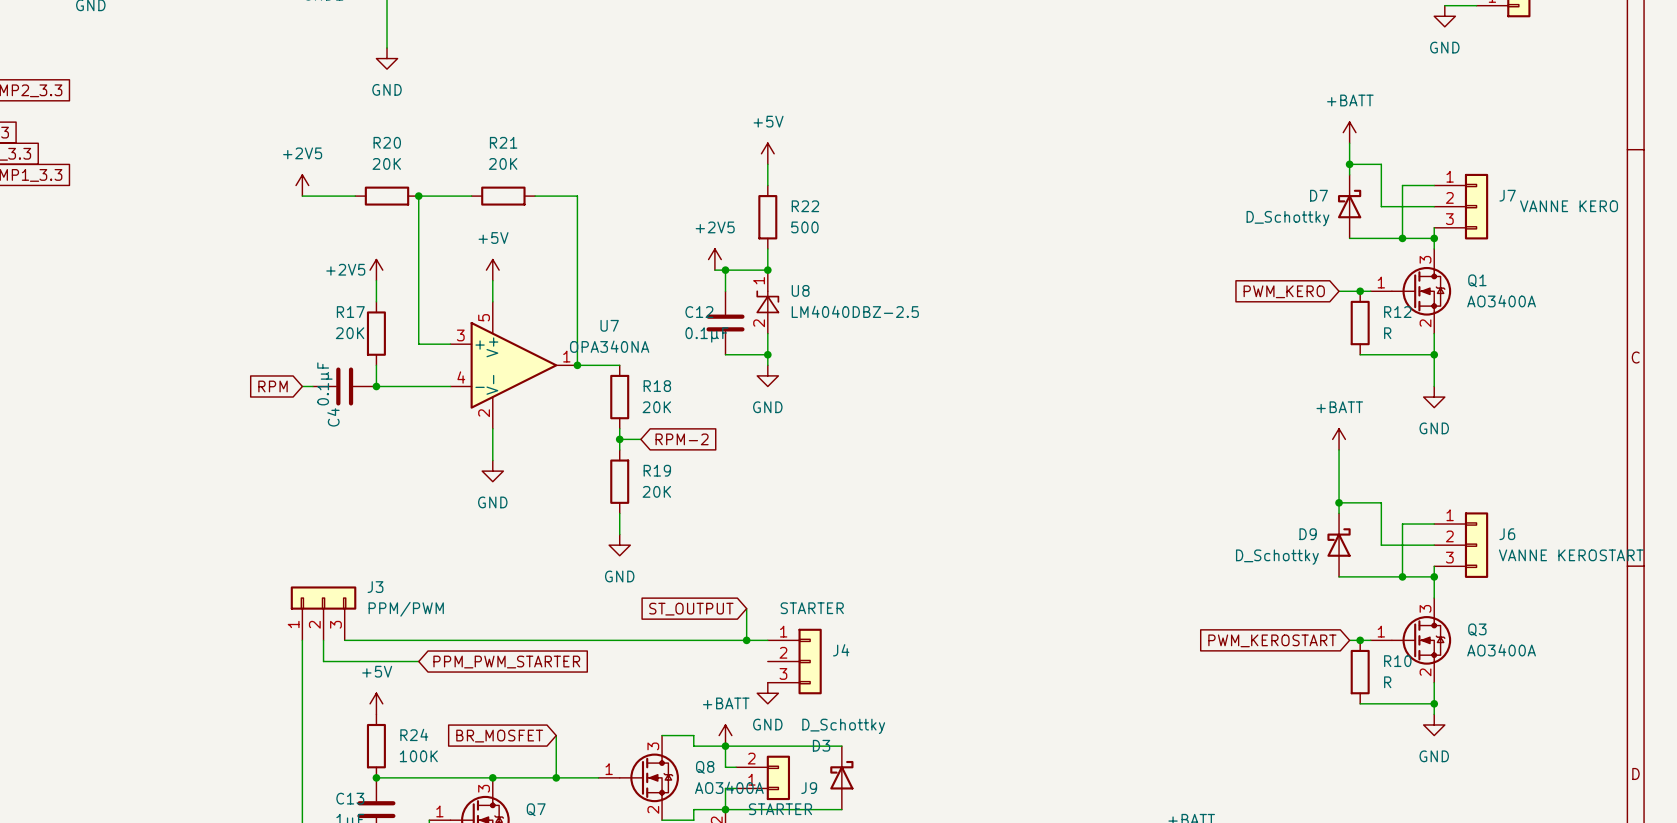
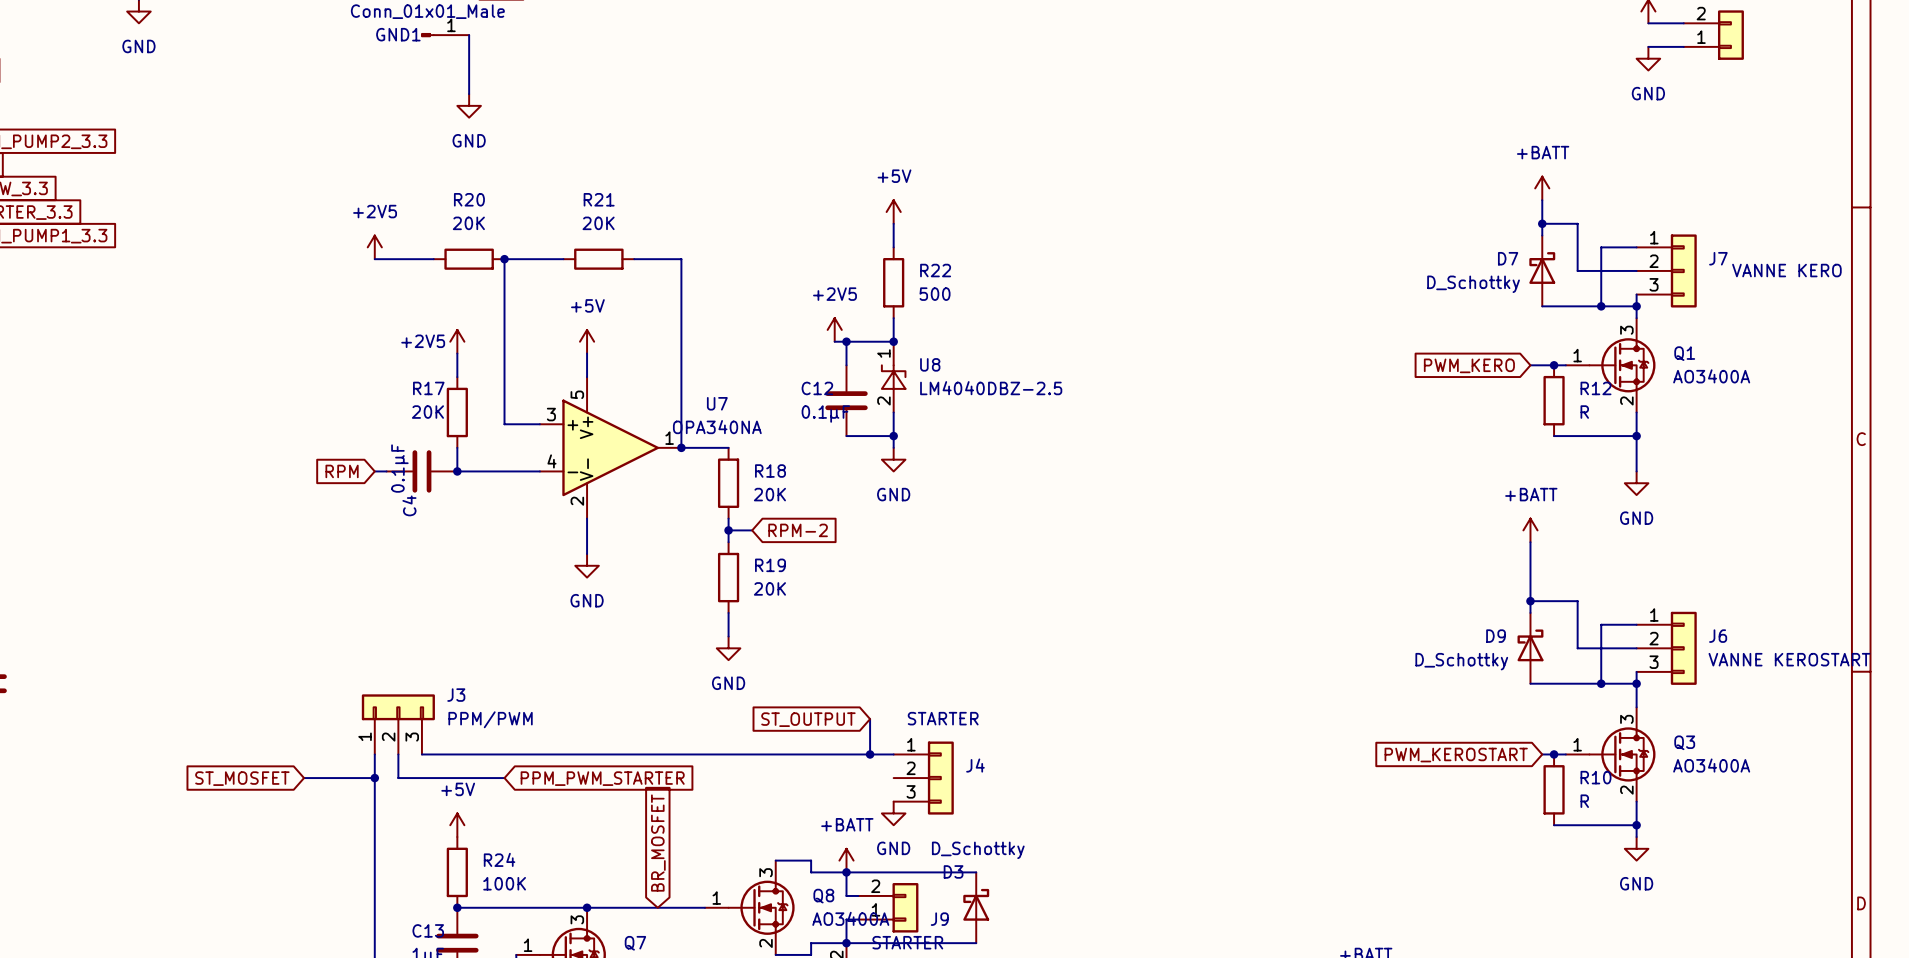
wire: none -> (304, 778) (374, 778)
junction: none -> (374, 778)
global label: none -> ST_MOSFET (242, 778)
wire: (556, 735) (556, 777) -> none
global label rotation: 0° (499, 736) -> 90° clockwise (658, 843)
junction: (556, 777) -> none

